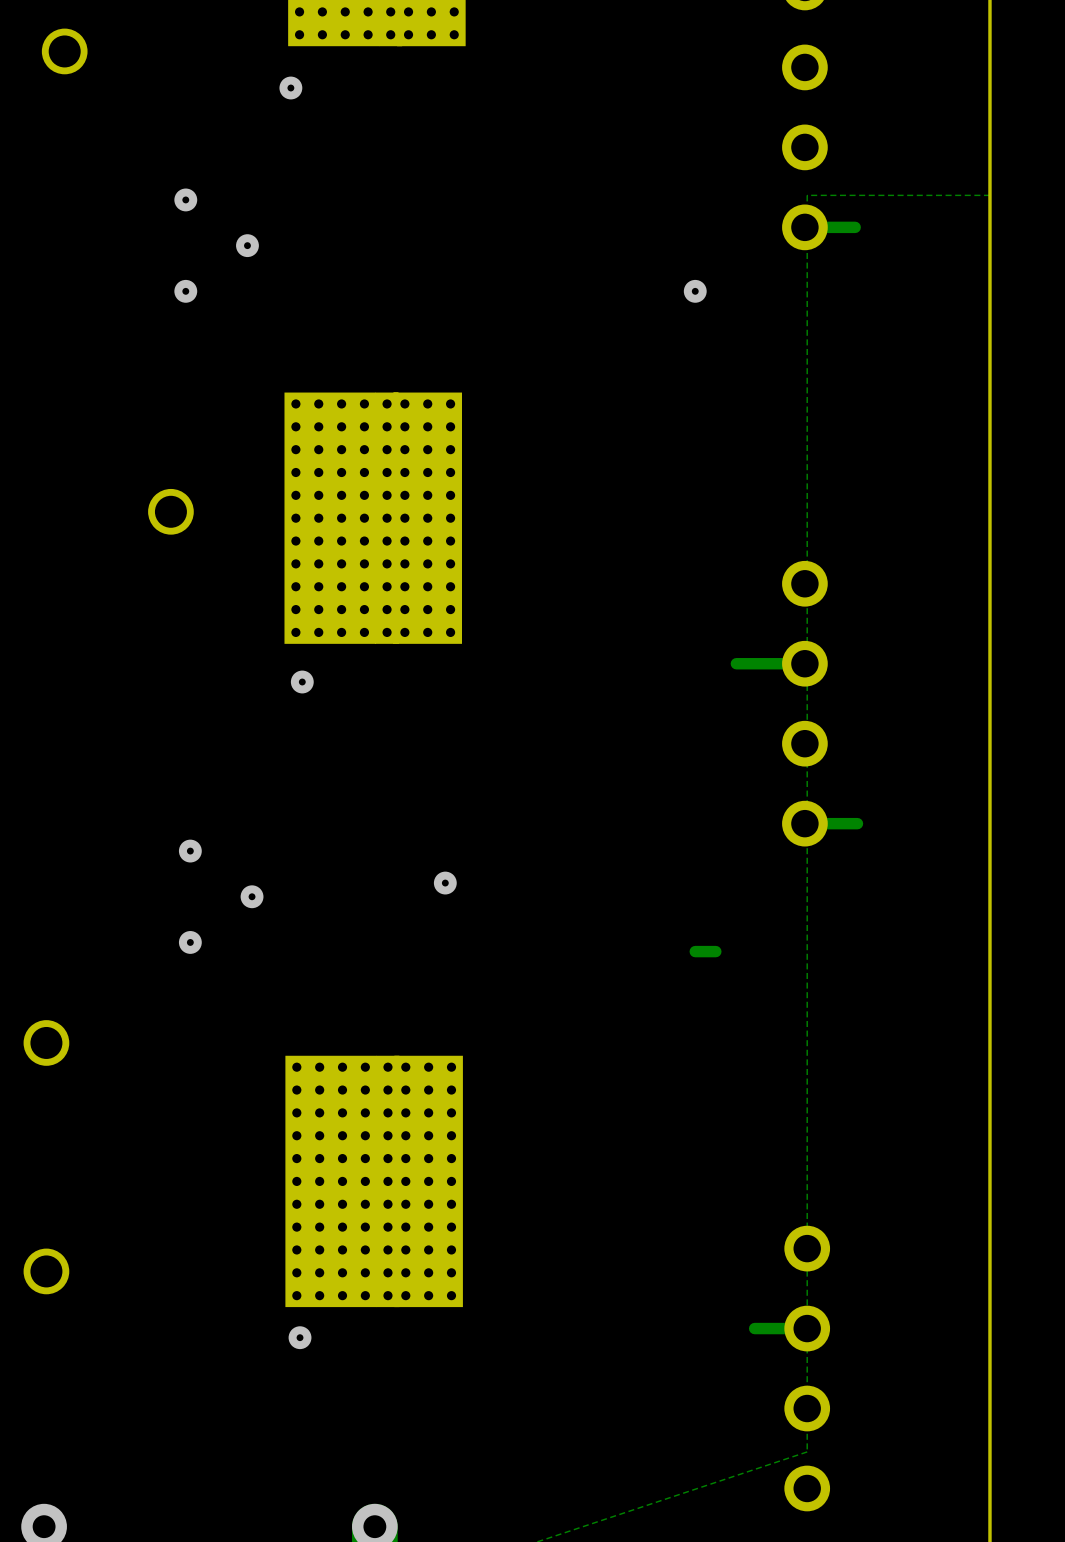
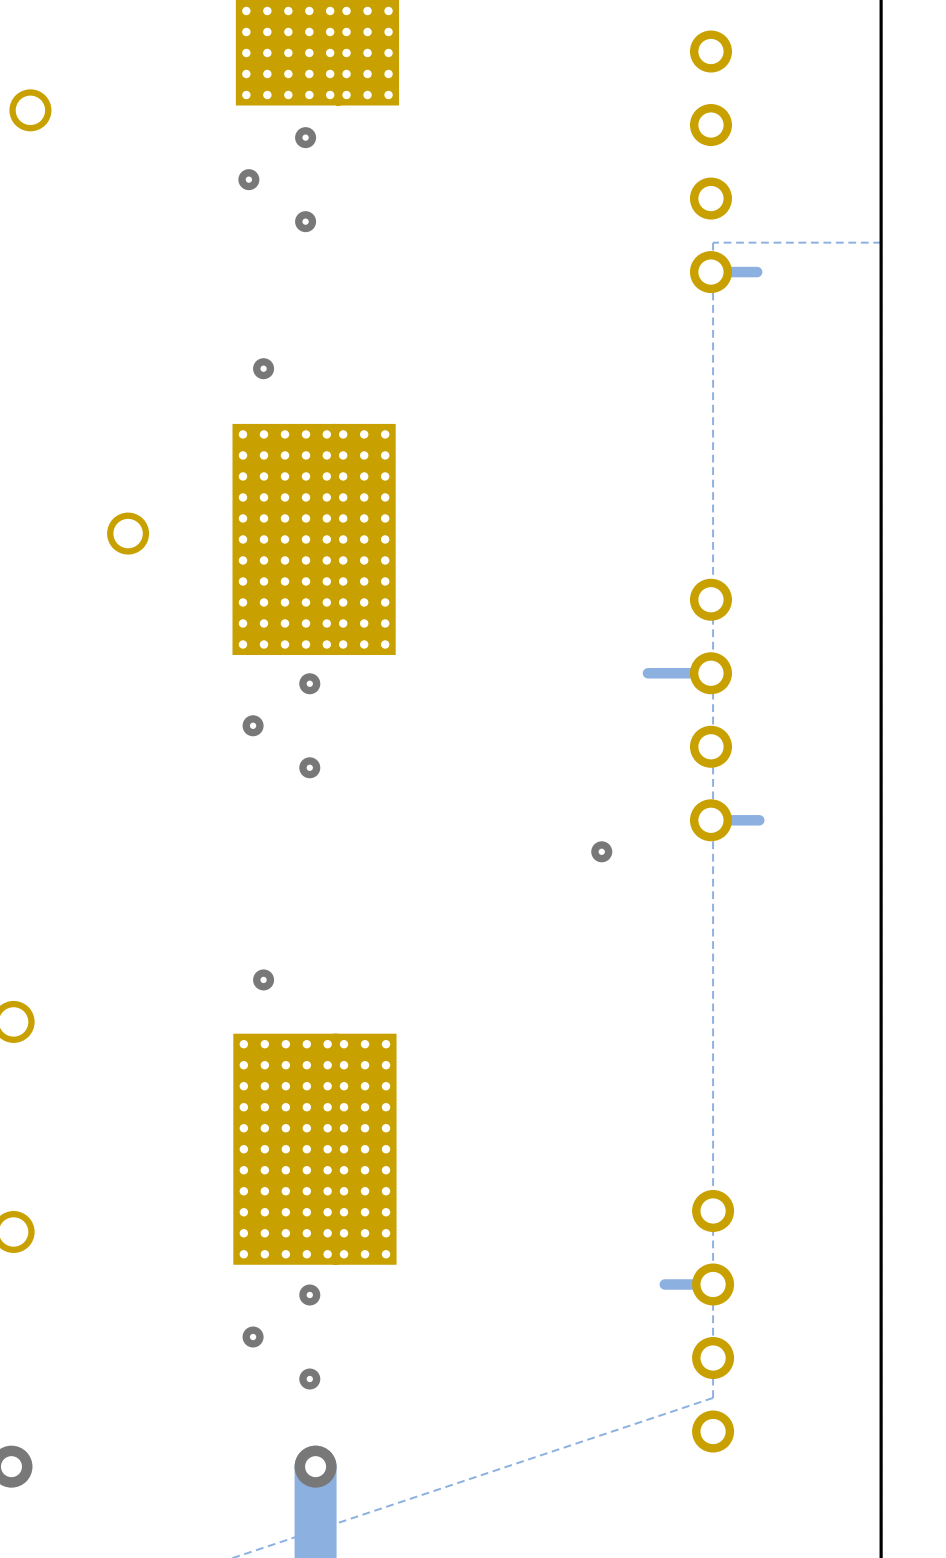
via: none -> (305, 137)
via: (290, 88) -> none
via: none -> (248, 179)
via: none -> (305, 221)
via: (185, 199) -> none
via: (247, 245) -> none
via: (185, 291) -> none
via: (695, 291) -> none
via: none -> (263, 368)
via: none -> (309, 683)
via: (302, 682) -> none
via: none -> (253, 725)
via: none -> (309, 767)
via: (190, 851) -> none
via: none -> (601, 851)
via: (445, 883) -> none
via: (252, 896) -> none
via: (190, 942) -> none
track: (715, 951) (695, 951) -> none
via: none -> (263, 979)
via: (300, 1337) -> none
via: none -> (309, 1295)
via: none -> (253, 1337)
via: none -> (309, 1379)

